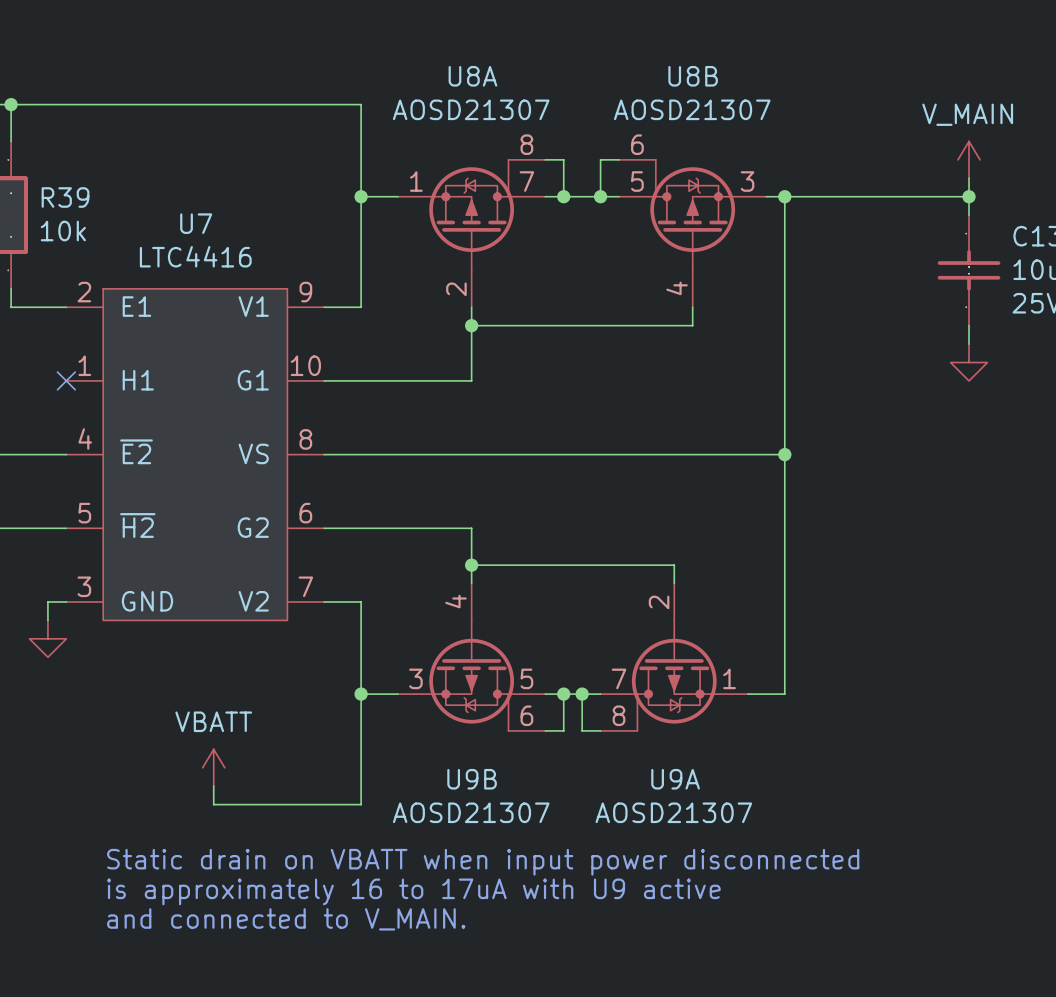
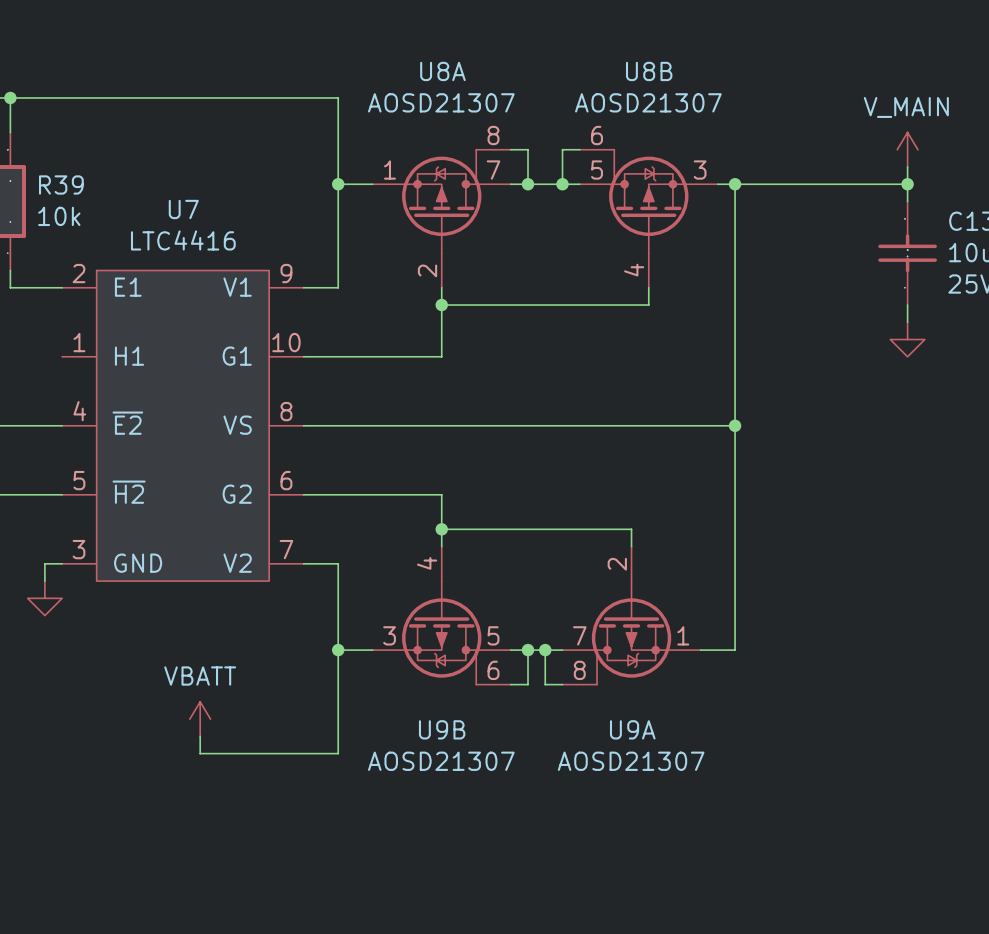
no-connect mark: (66, 380) -> none
text: Static drain on VBATT when input power disconnected (483, 862) -> none
text: is approximately 16 to 17uA with U9 active (413, 891) -> none
text: and connected to V_MAIN. (286, 919) -> none

